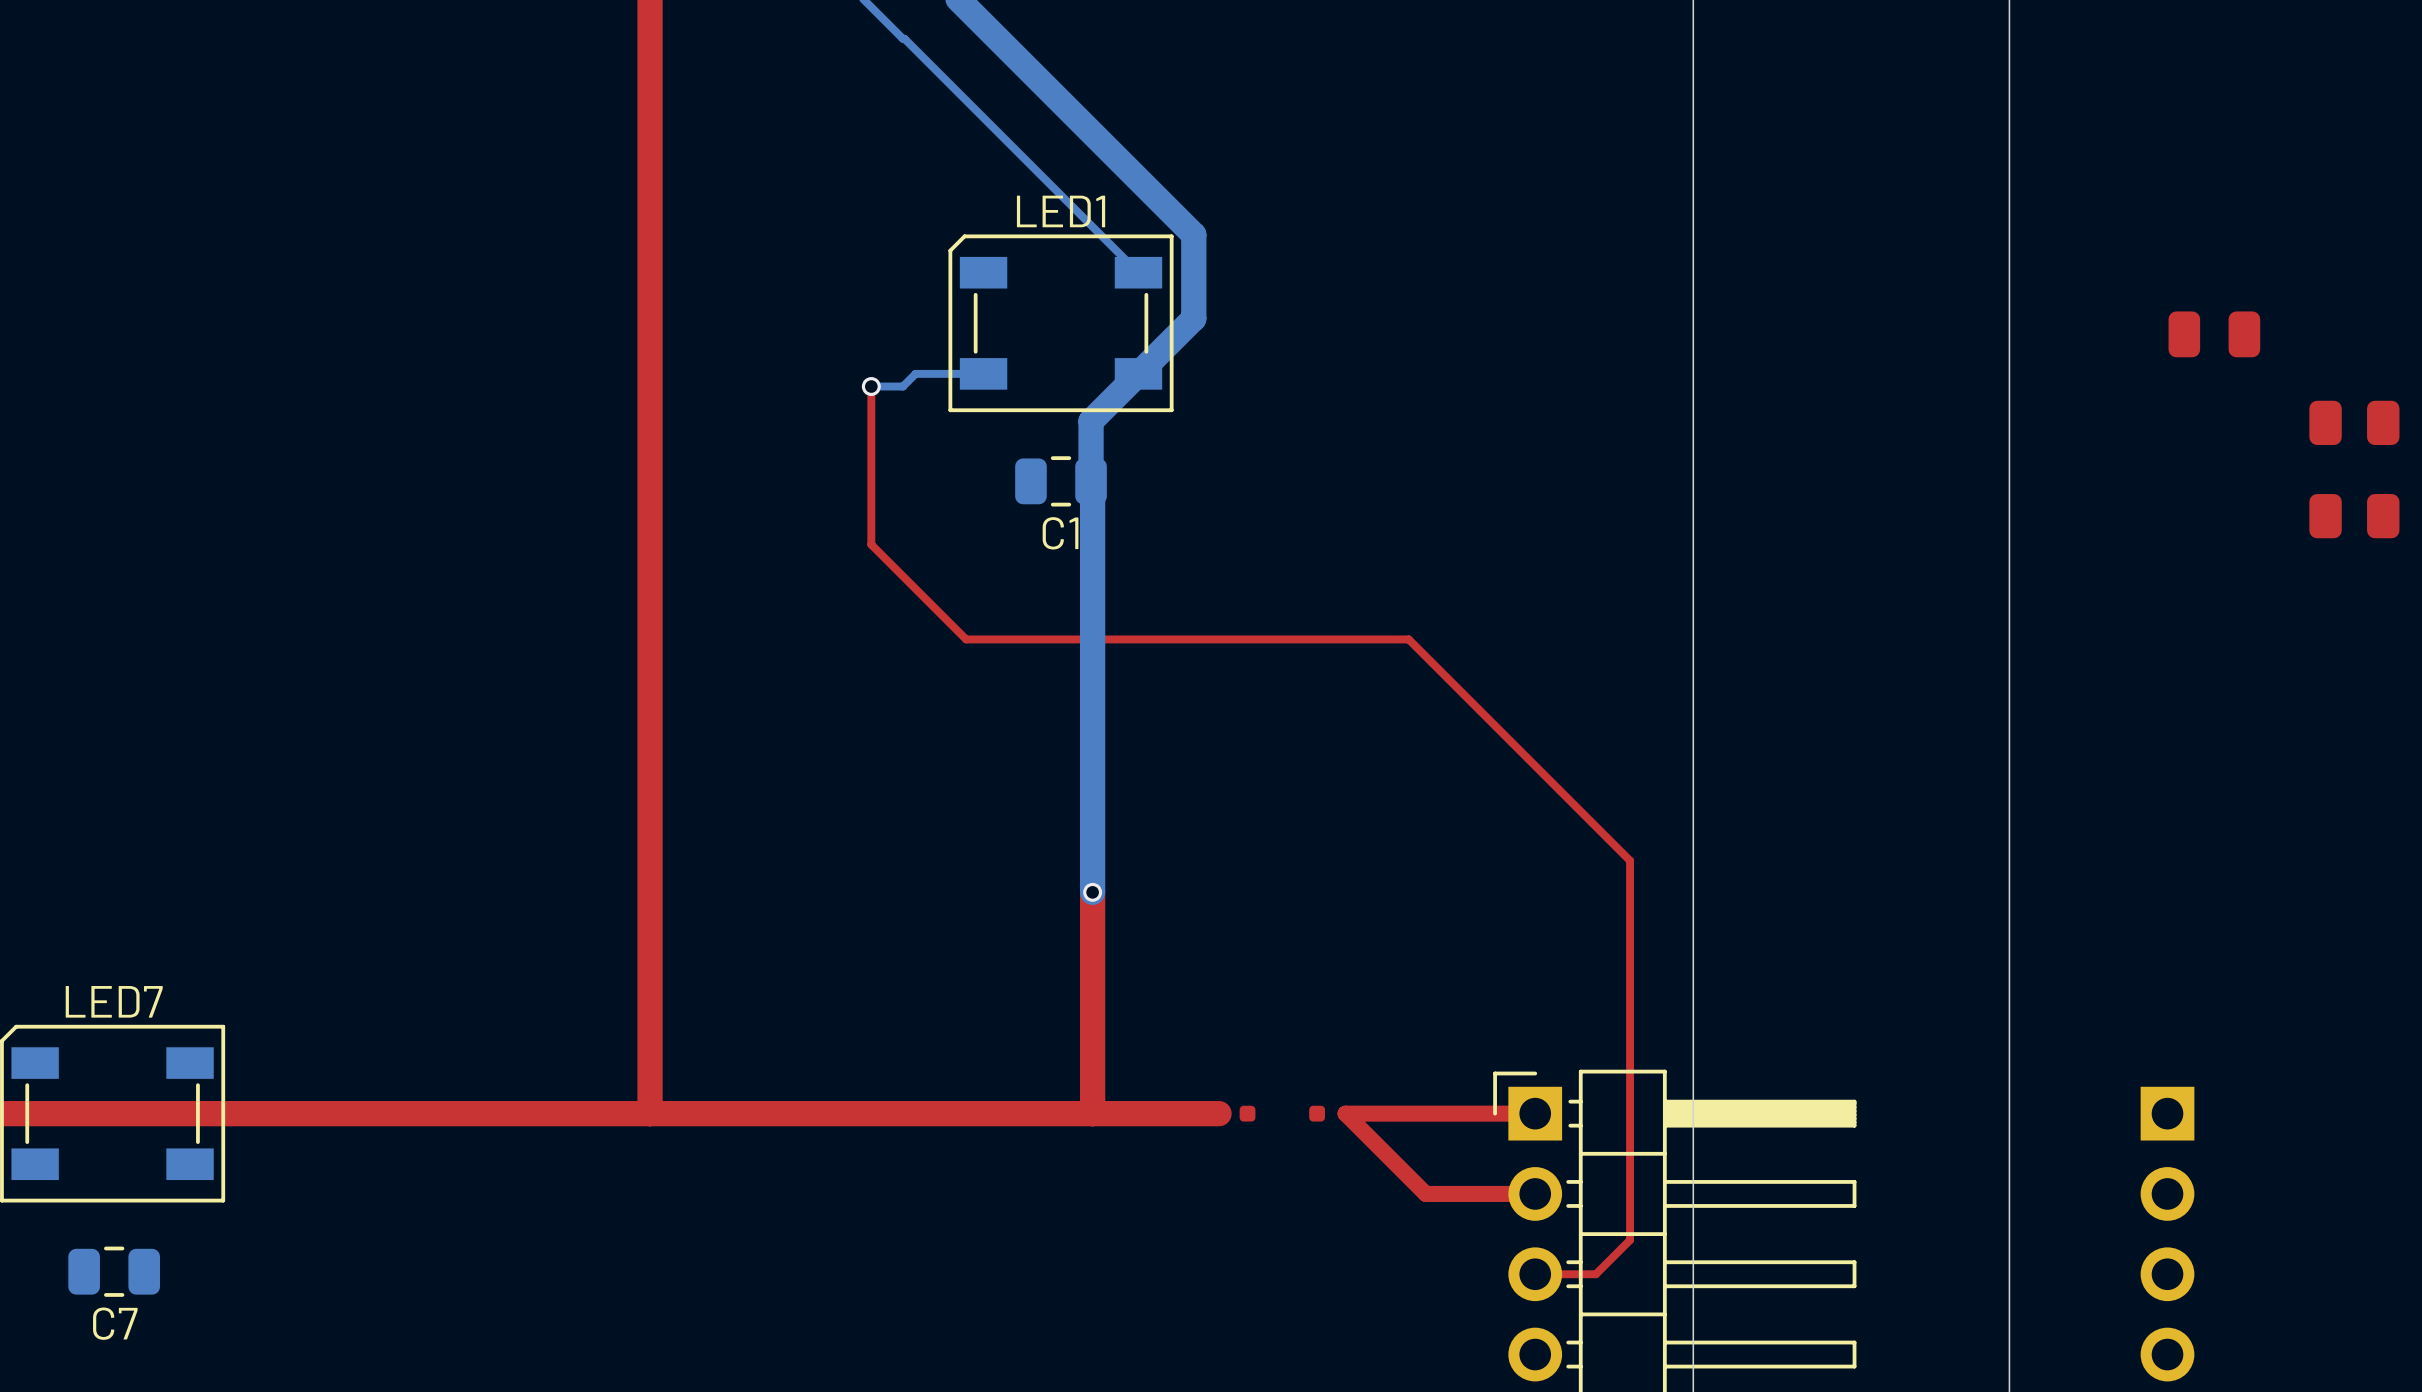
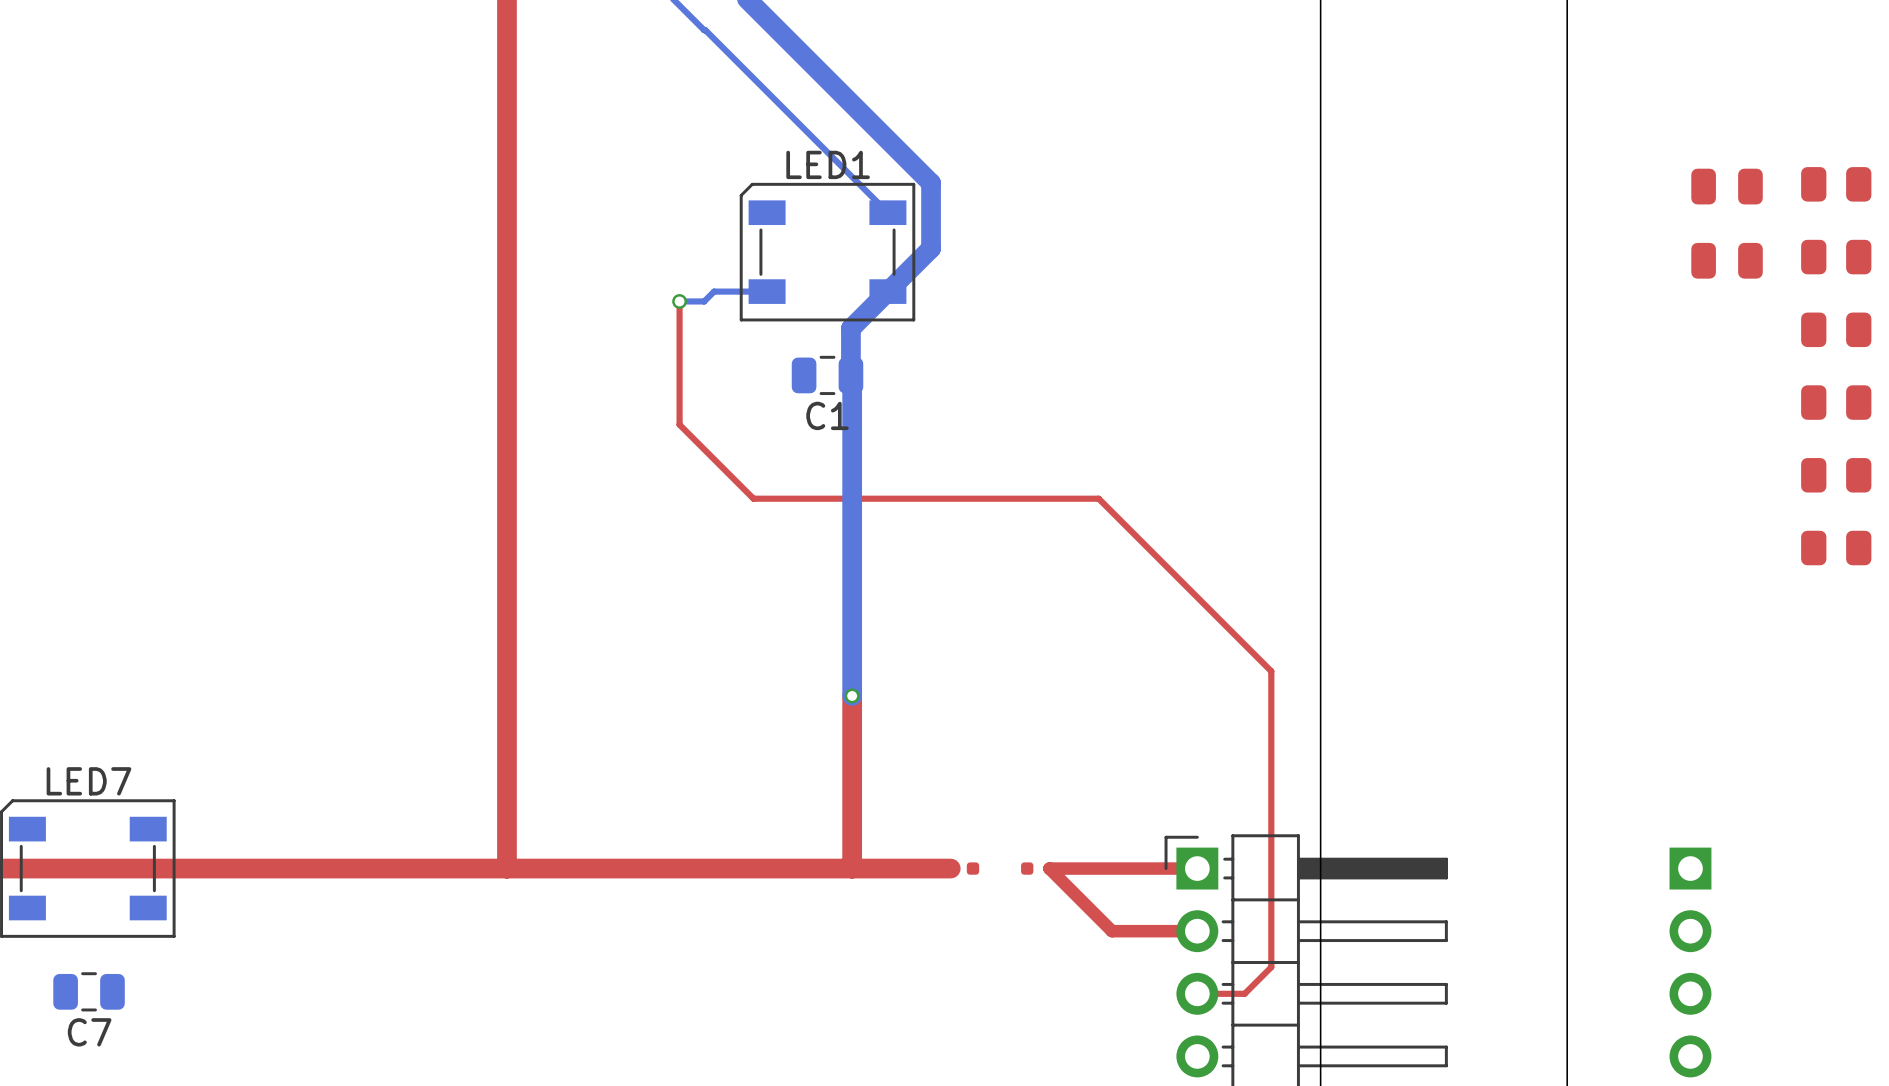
part: none -> (1836, 184)
part: none -> (1727, 186)
part: none -> (1836, 257)
part: none -> (1836, 475)
part: none -> (1836, 548)

